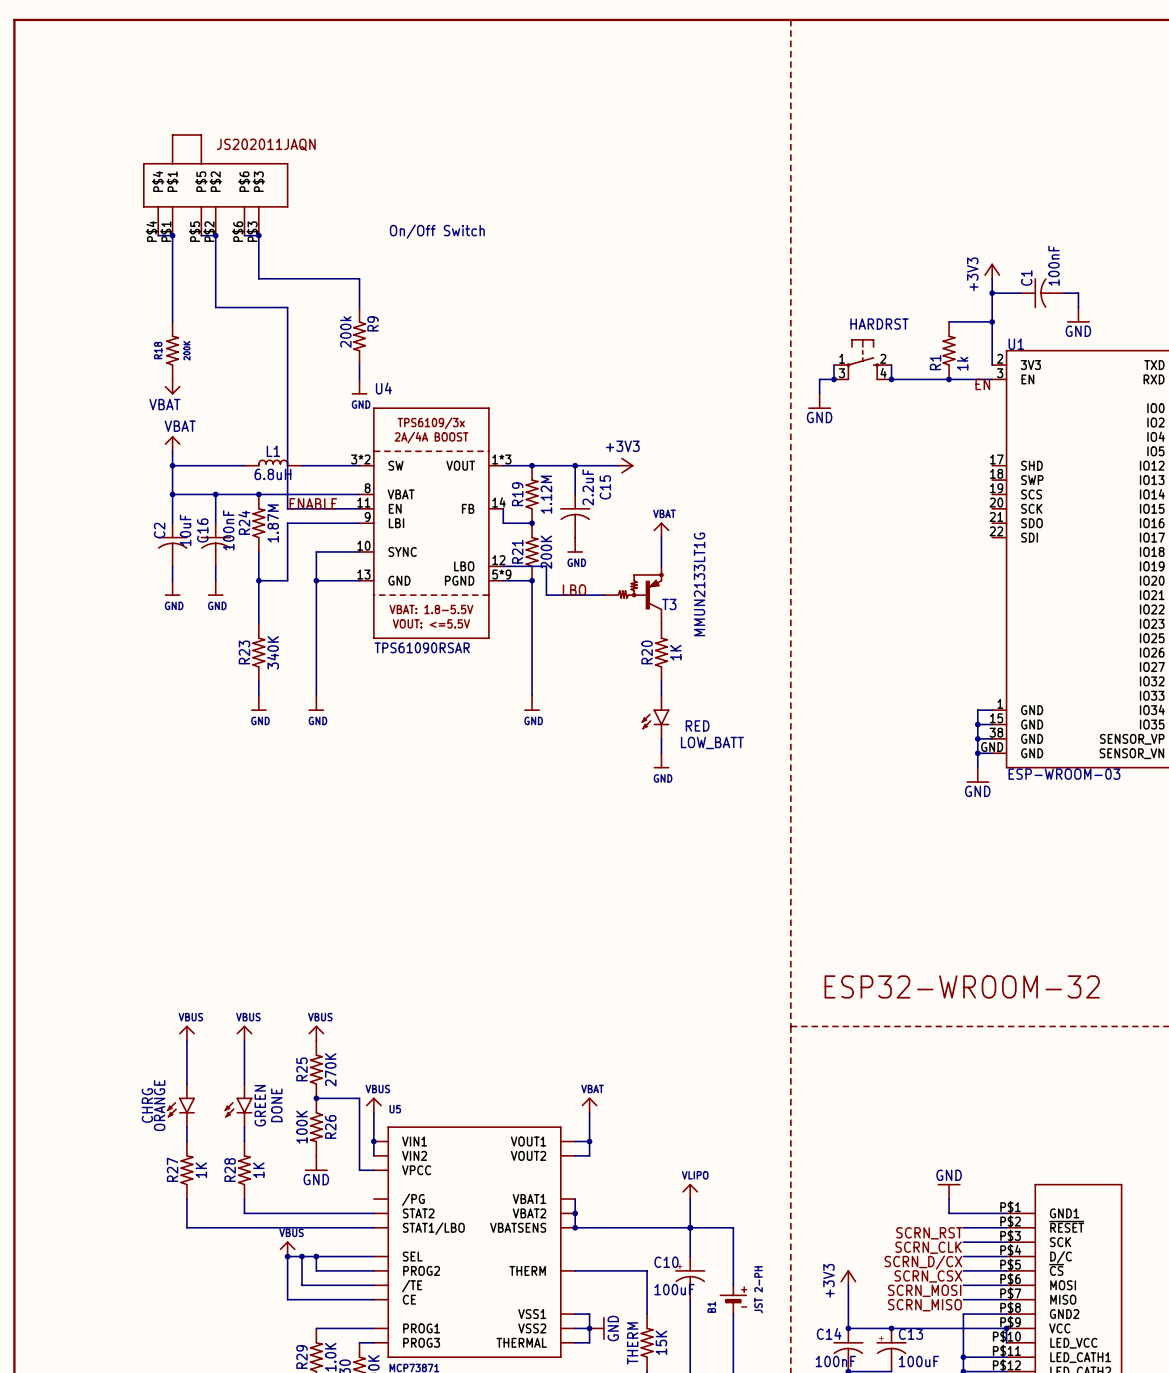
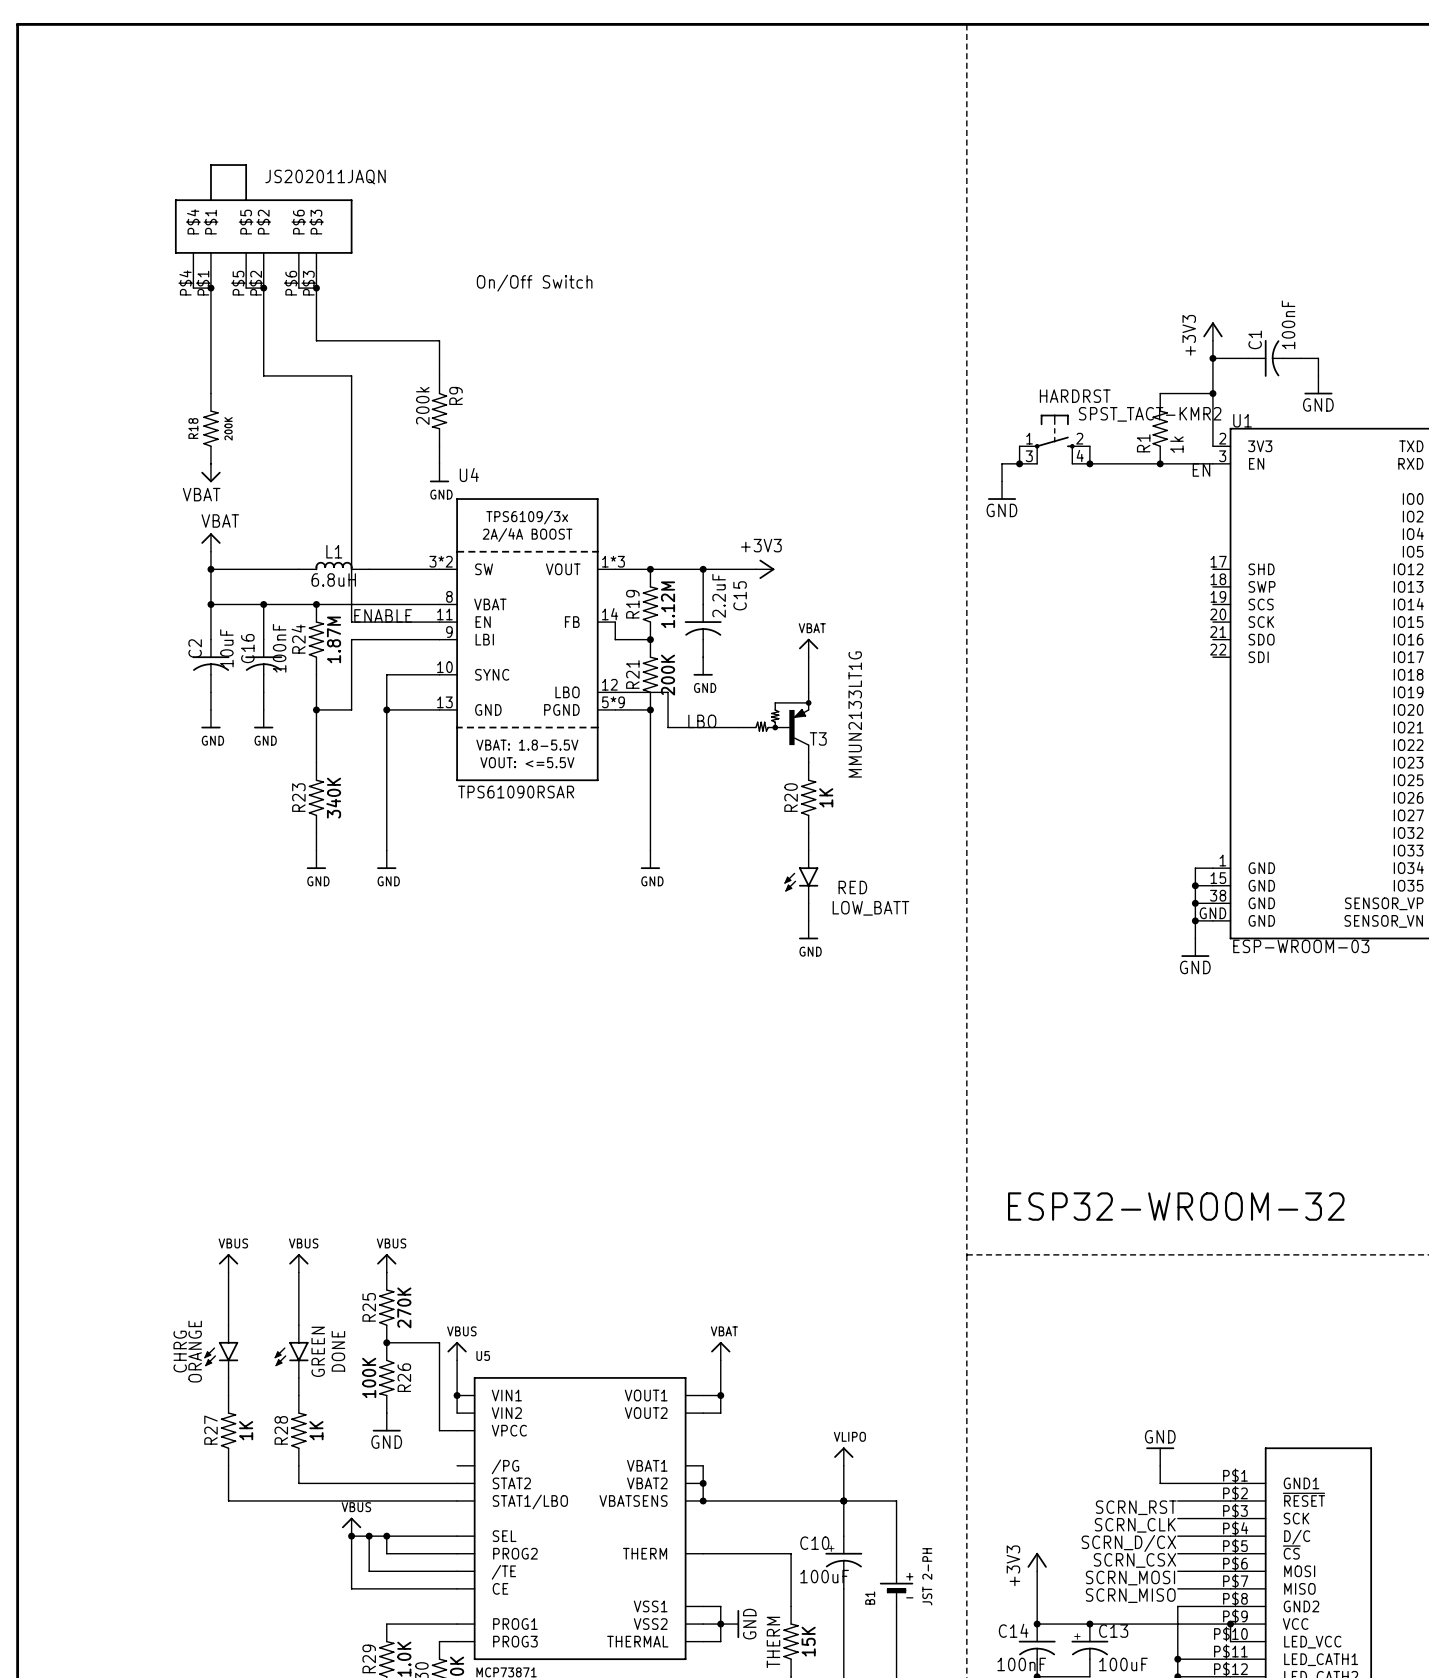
HARDRST value: none -> SPST_TACT-KMR2 (1150, 414)

